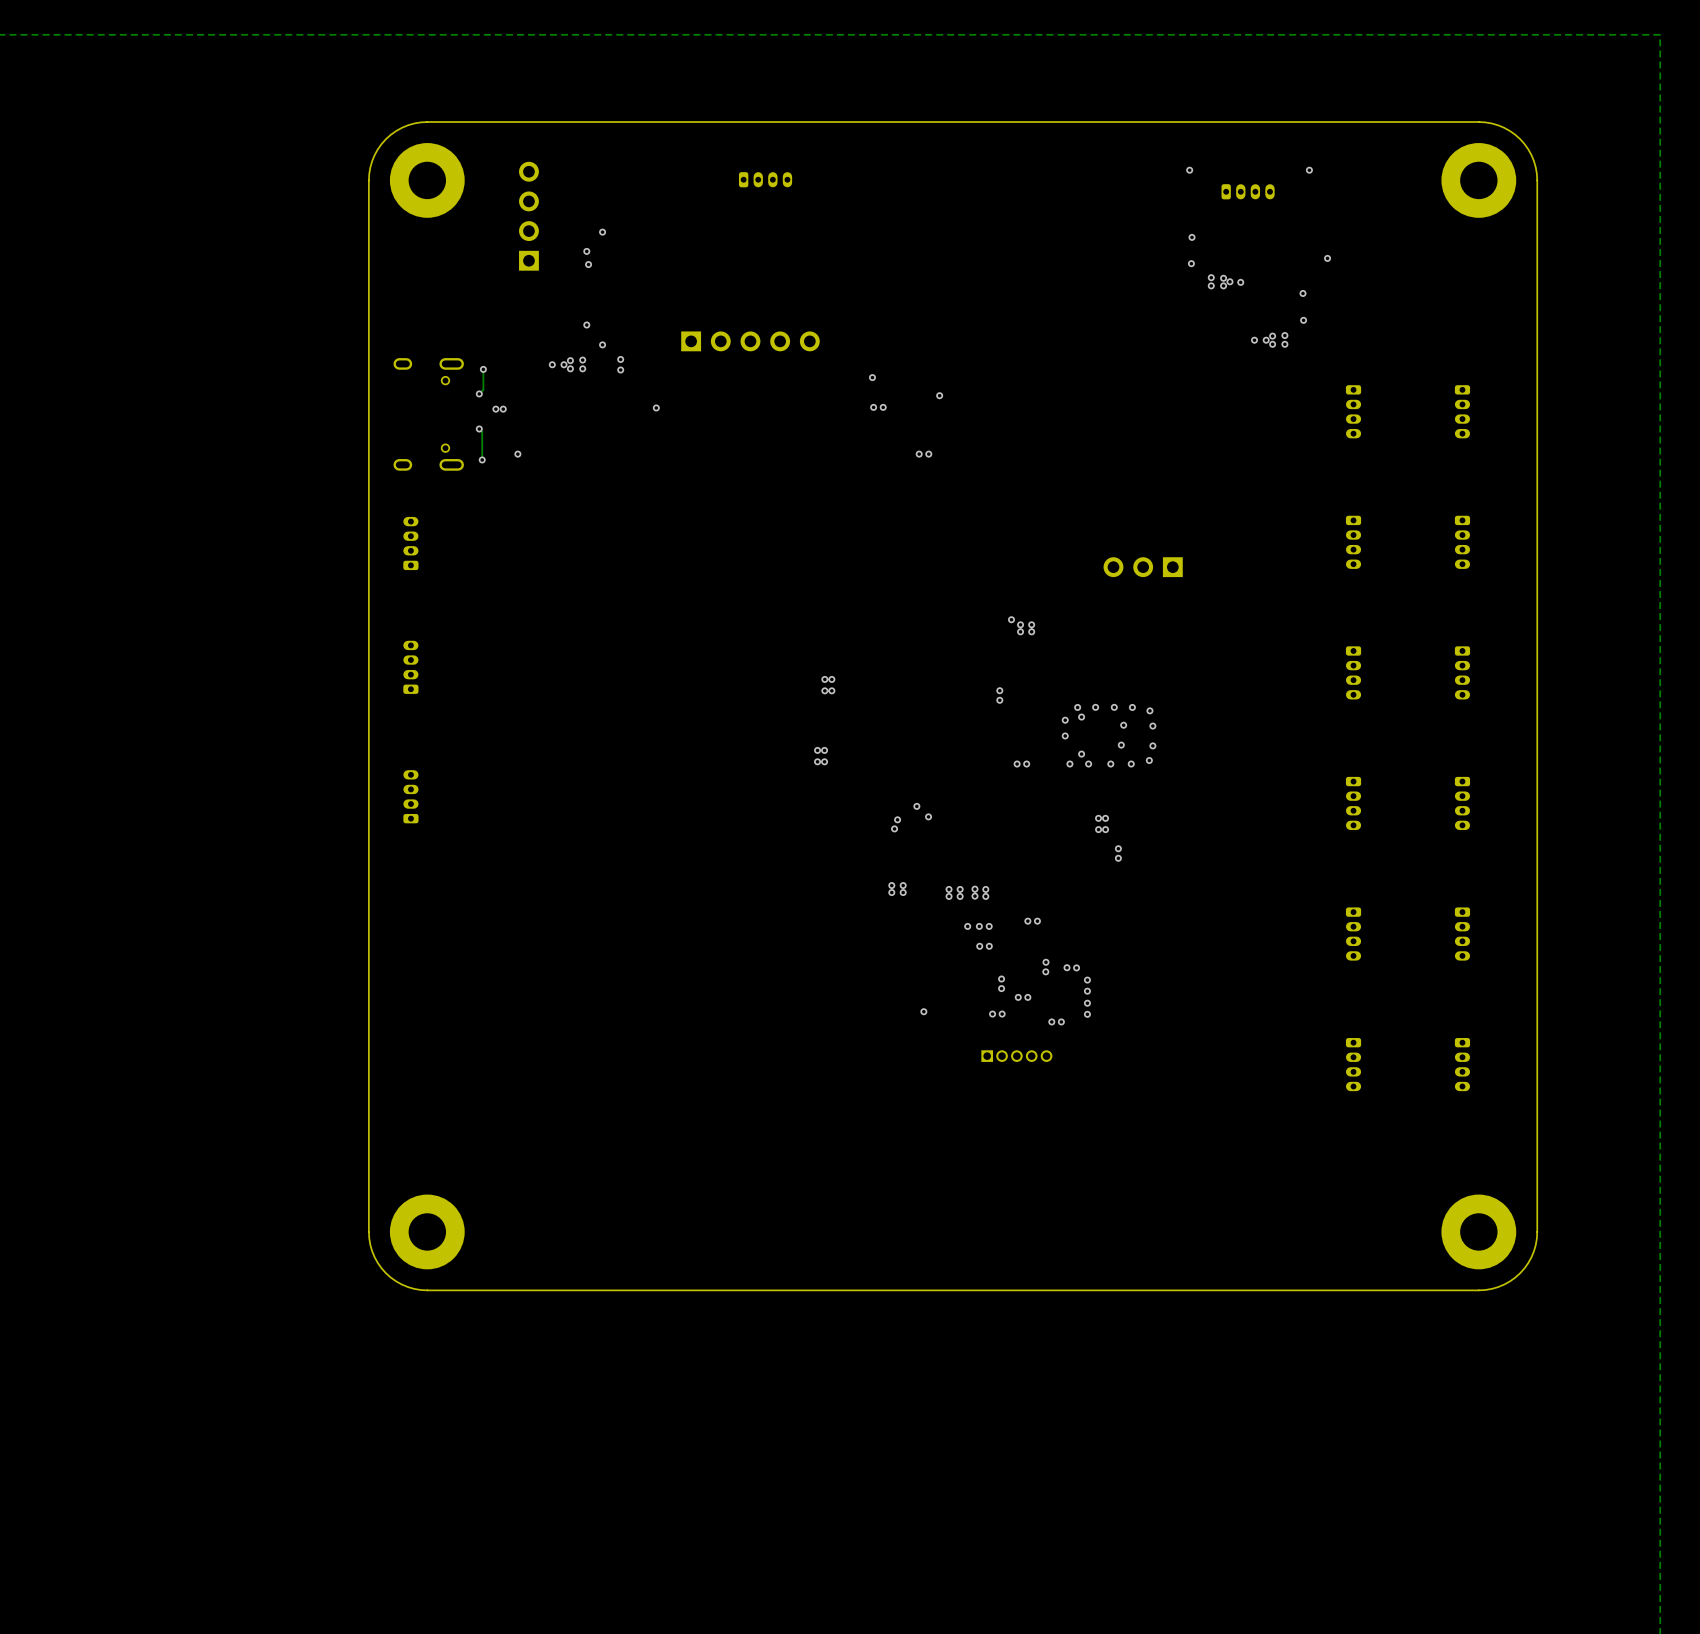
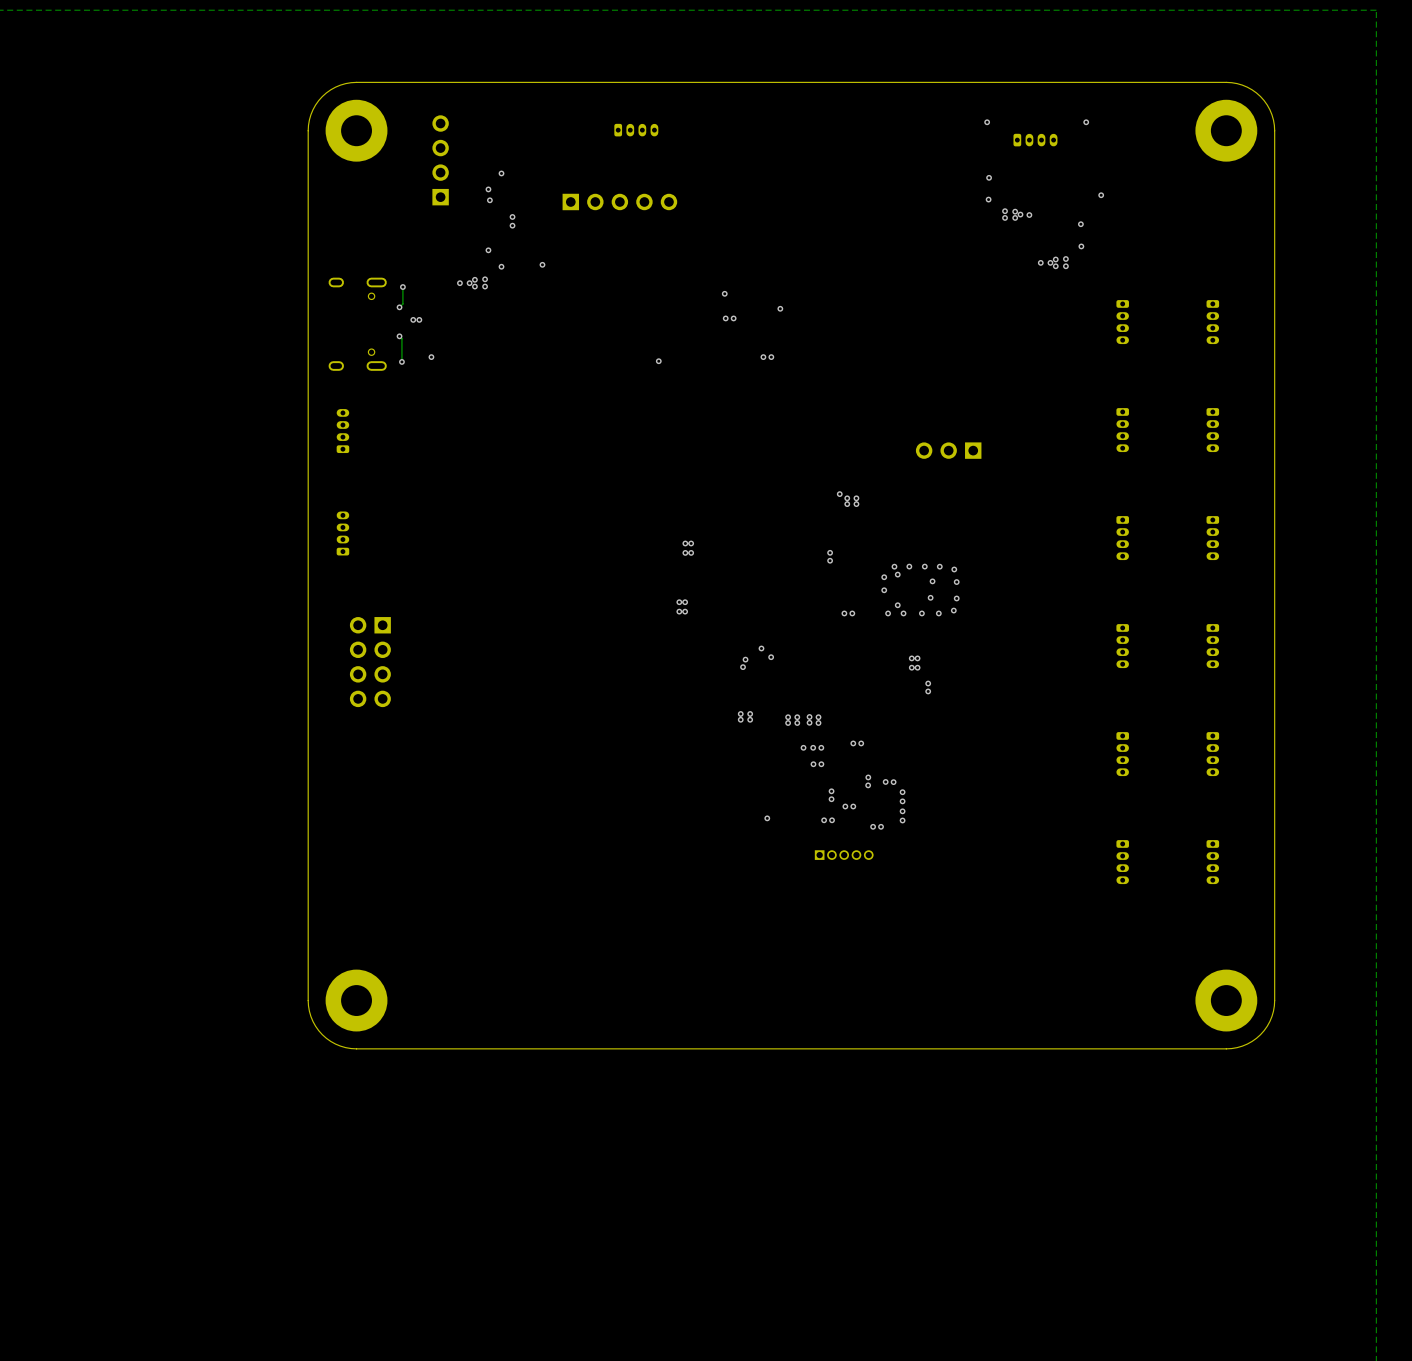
via: none -> (512, 216)
via: none -> (512, 225)
part position: (750, 341) -> (619, 201)
via: none -> (542, 264)
via: (620, 359) -> none
via: (620, 370) -> none
via: (656, 407) -> none
via: none -> (658, 361)
part: (410, 796) -> none
part: none -> (370, 662)

